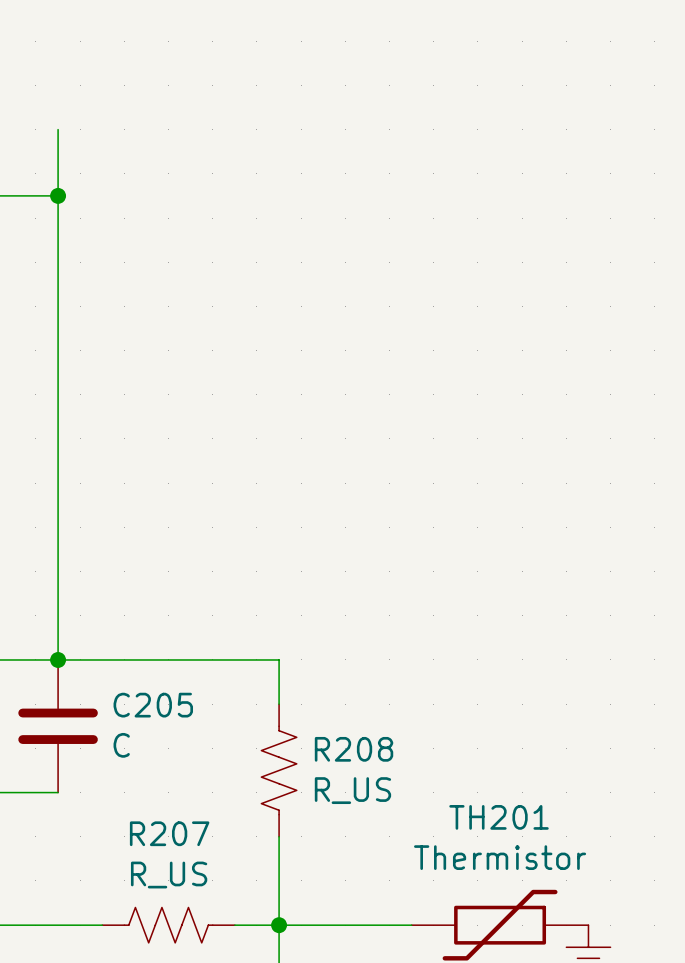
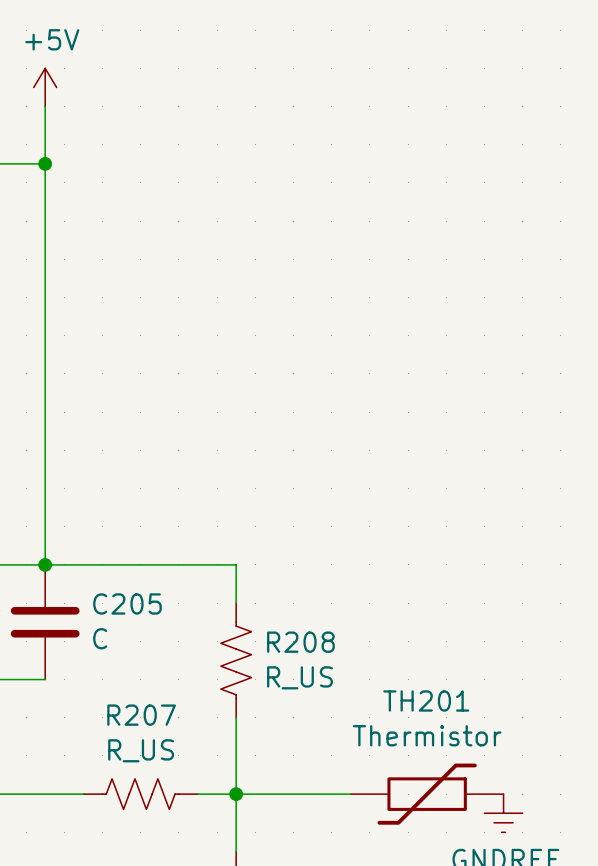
power symbol: none -> +5V (45, 87)

